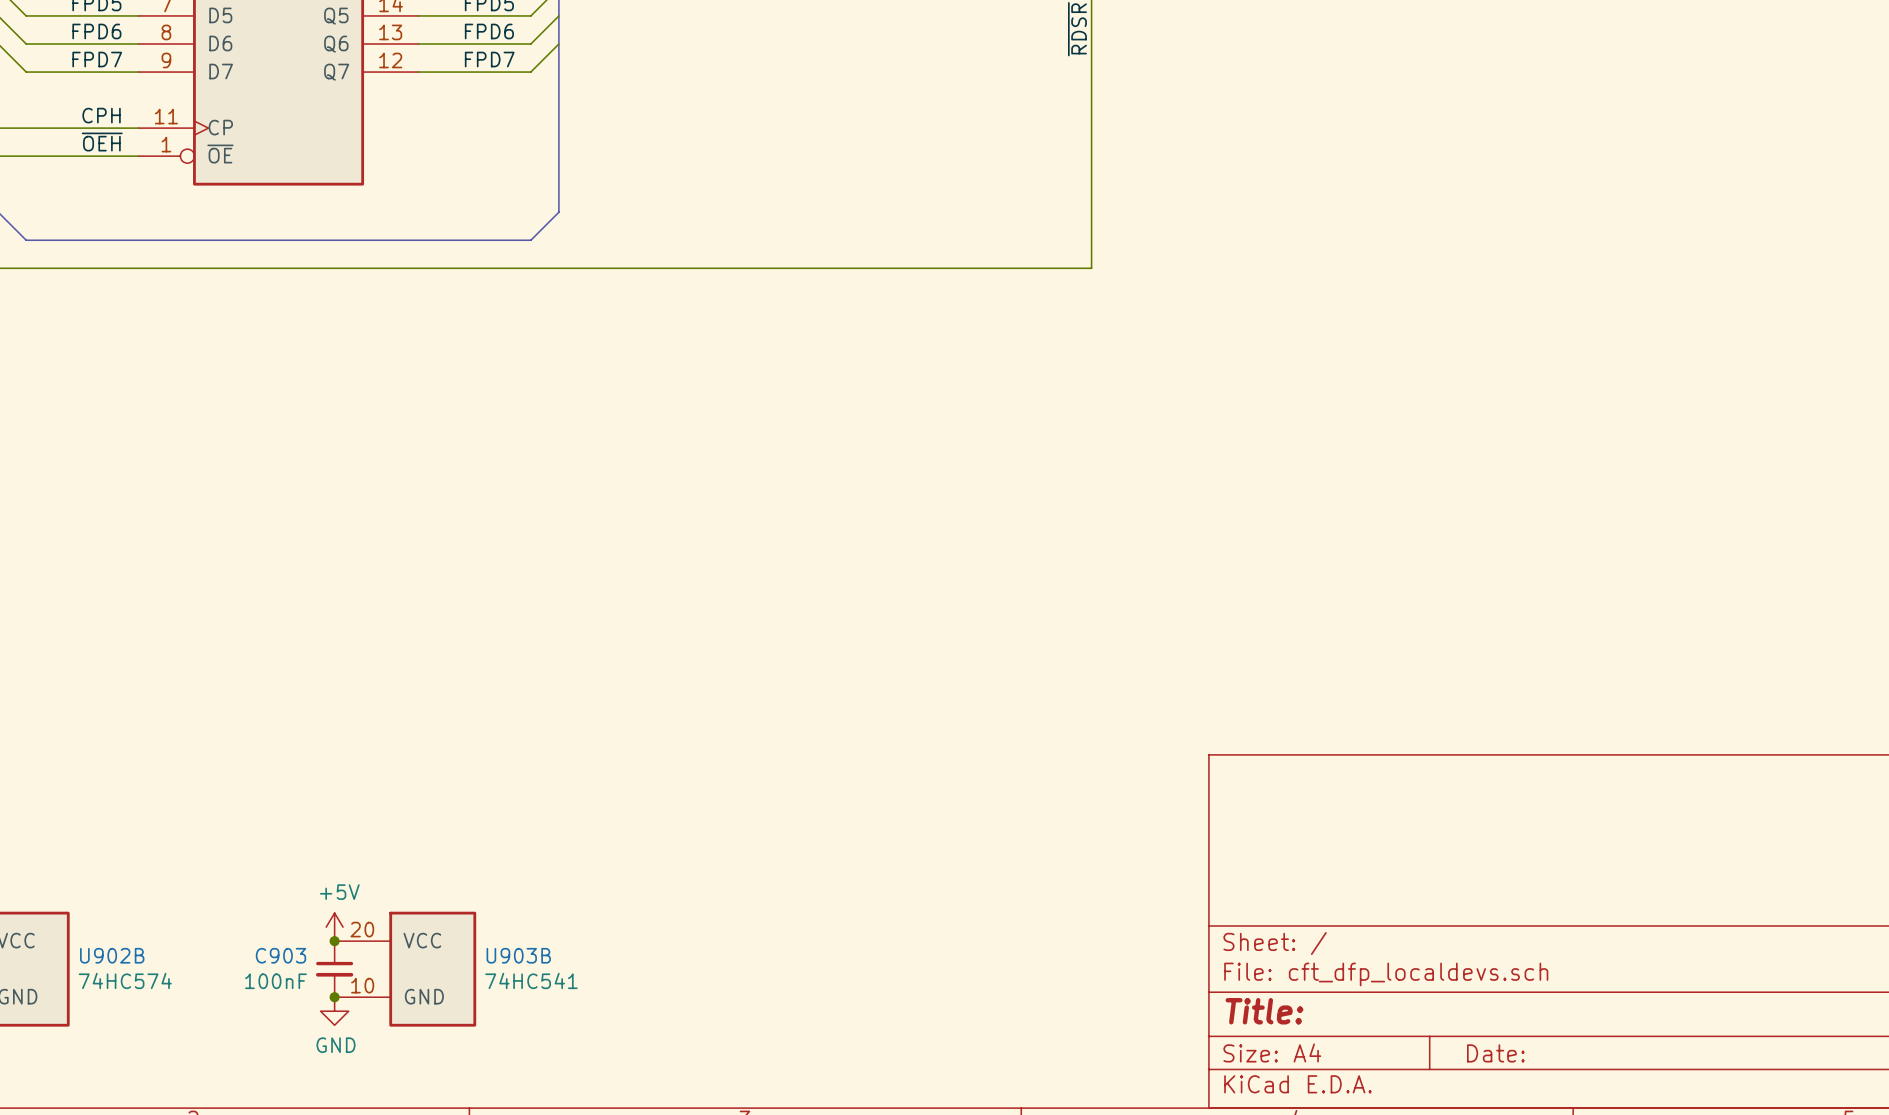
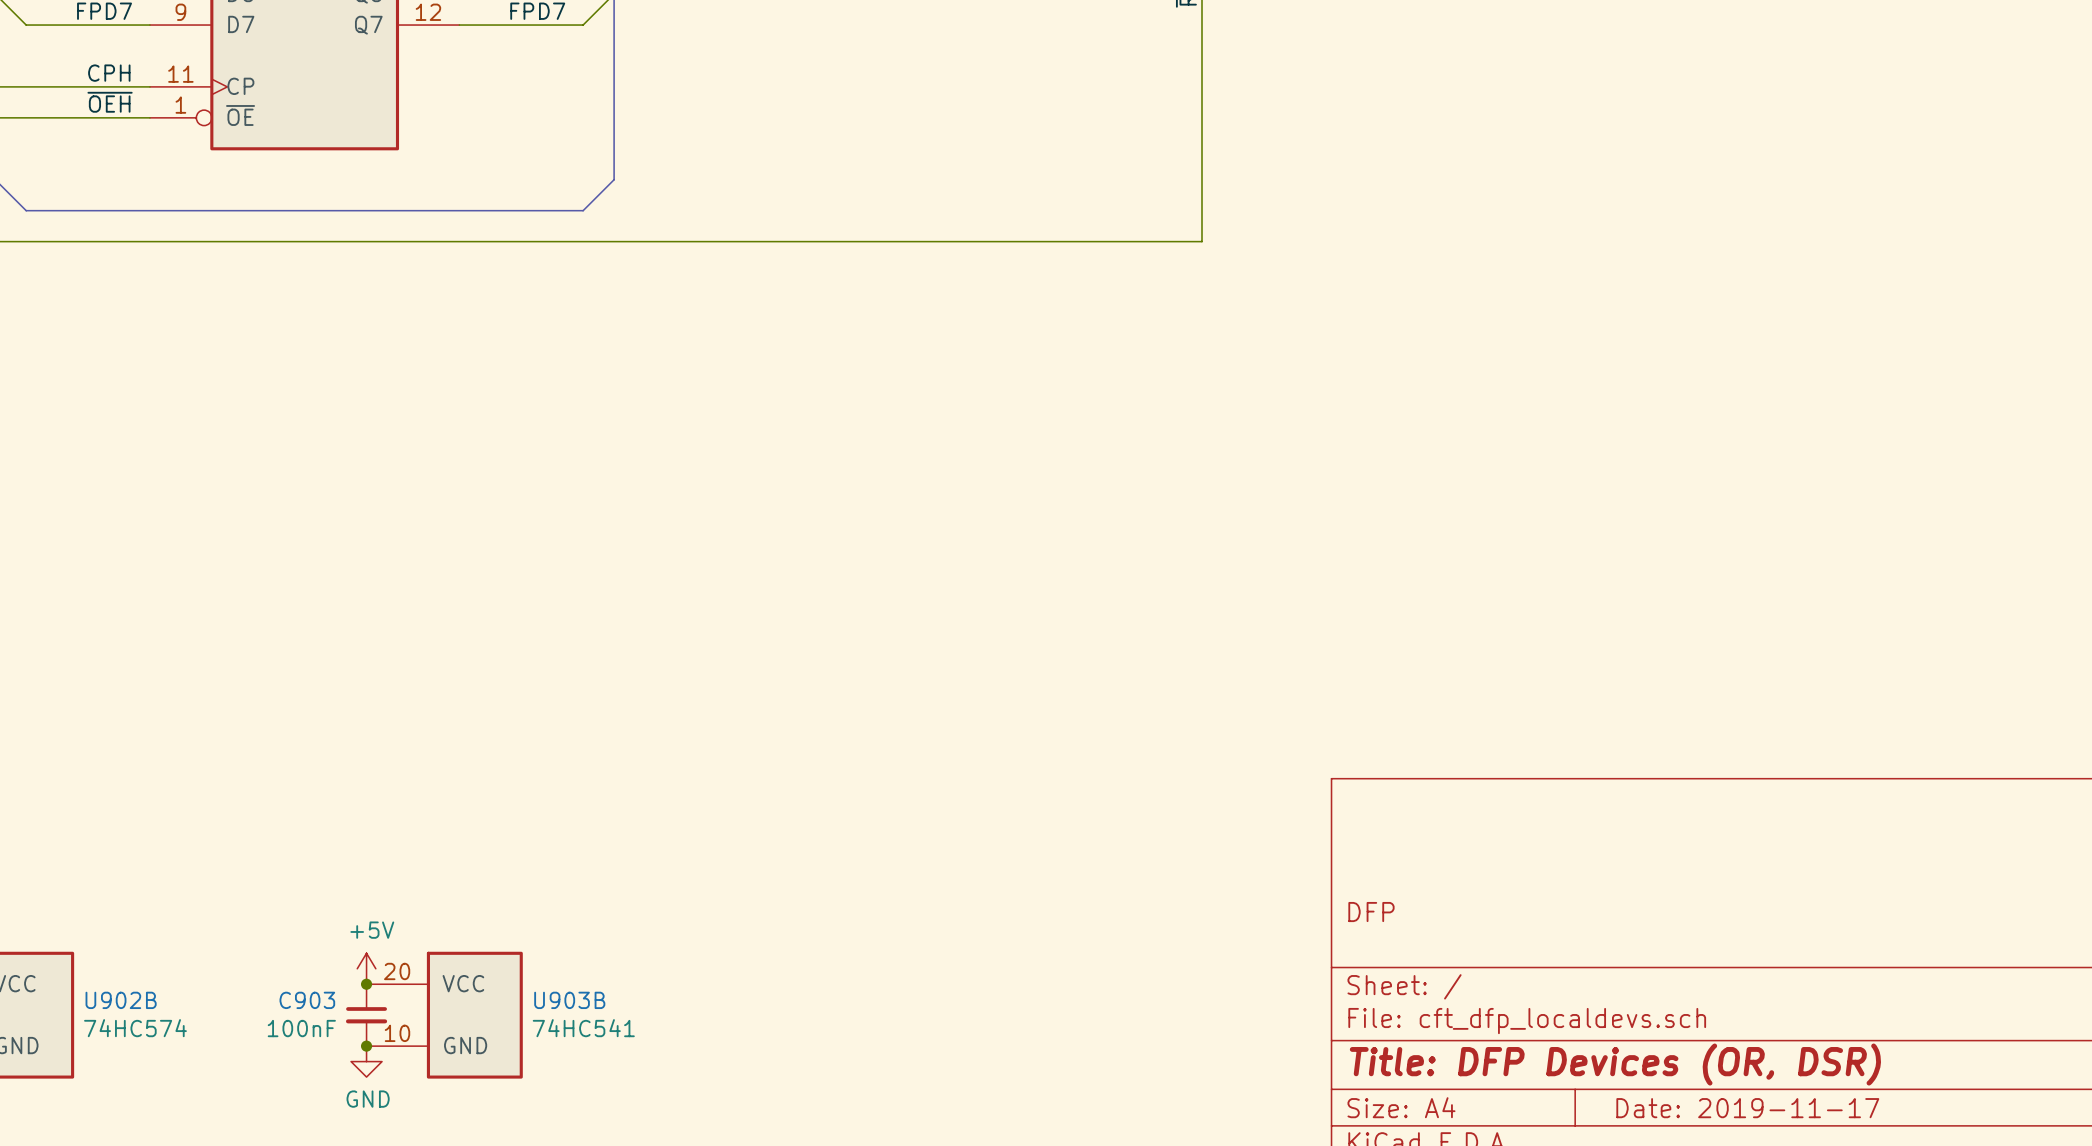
title block: none -> DFP (1371, 912)
title block: Title: (1264, 1011) -> Title: DFP Devices (OR, DSR) (1615, 1064)
title block: Date: (1495, 1053) -> Date: 2019-11-17 (1747, 1108)

